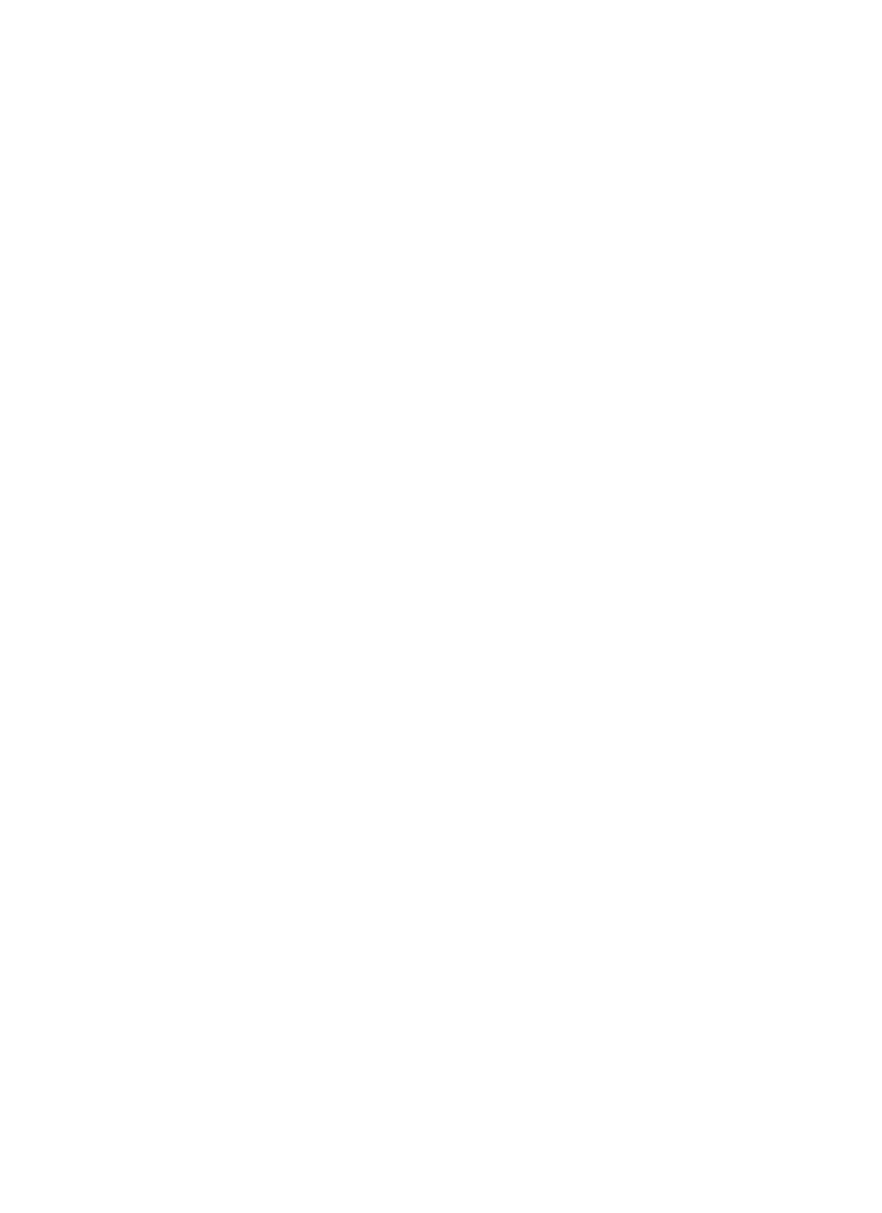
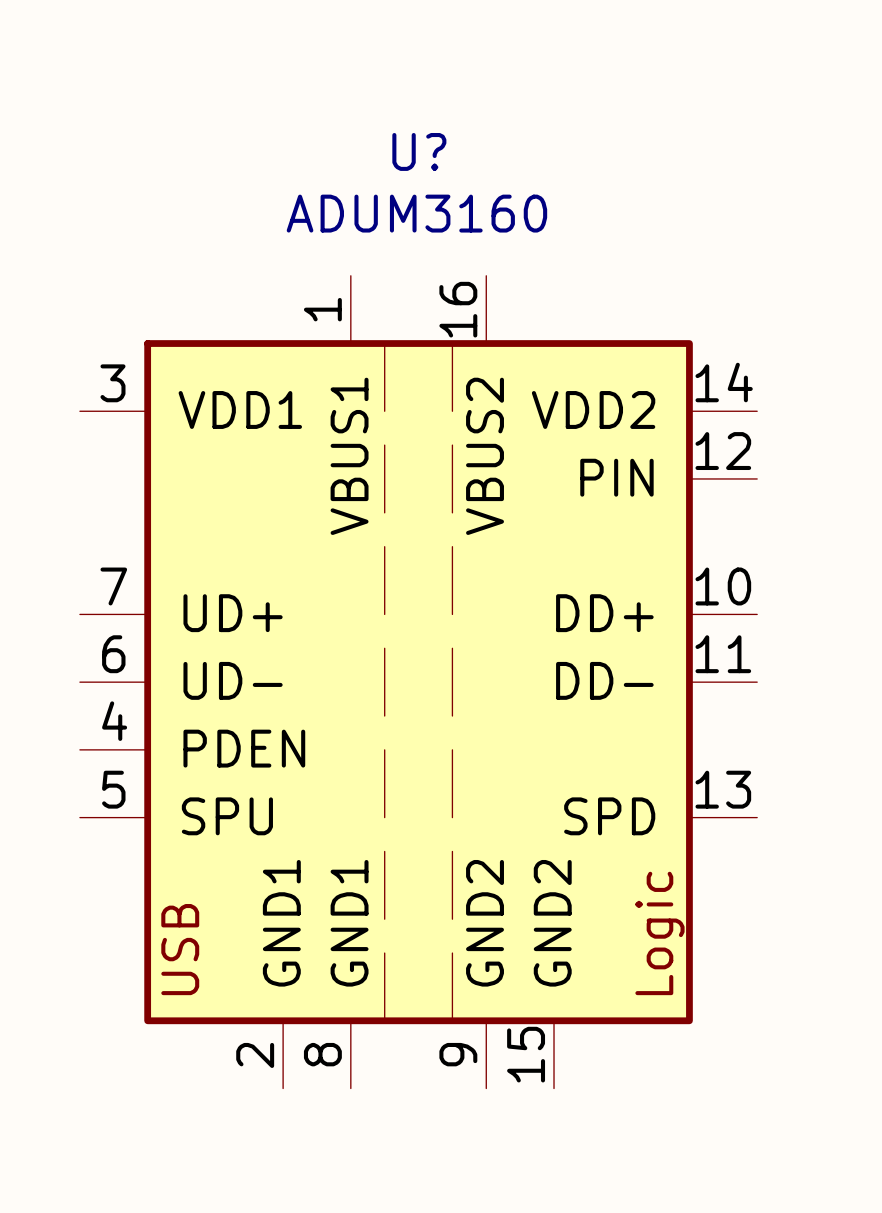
U?: none -> ADUM3160 (418, 682)

